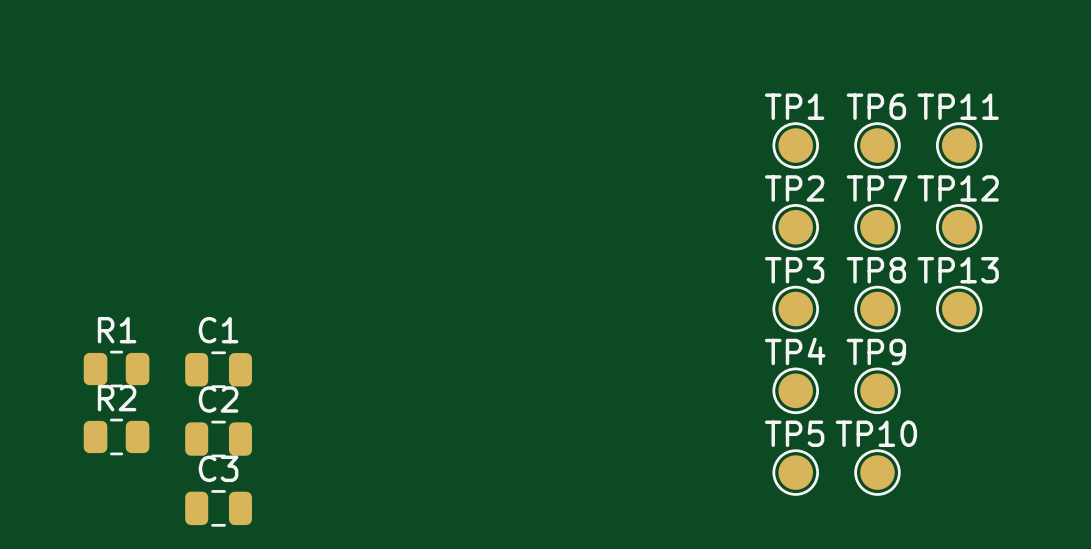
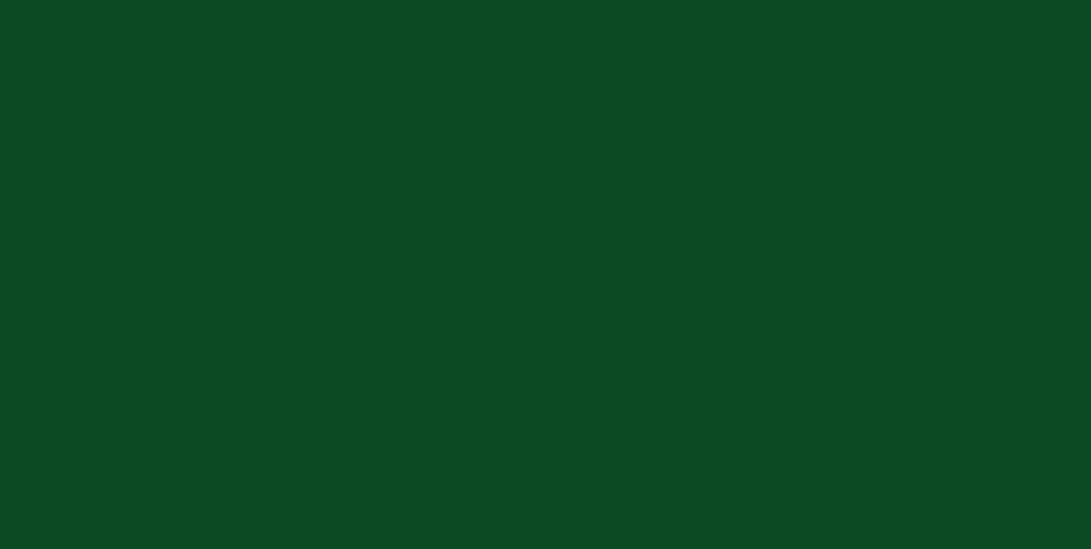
TP1: (795, 145) -> none
TP6: (877, 145) -> none
TP11: (959, 145) -> none
TP2: (795, 227) -> none
TP7: (877, 227) -> none
TP12: (959, 227) -> none
TP3: (795, 309) -> none
TP8: (877, 309) -> none
TP13: (959, 309) -> none
R1: (116, 369) -> none
C1: (218, 369) -> none
TP4: (795, 390) -> none
TP9: (877, 390) -> none
R2: (116, 436) -> none
C2: (218, 439) -> none
TP5: (795, 472) -> none
TP10: (877, 472) -> none
C3: (218, 508) -> none

